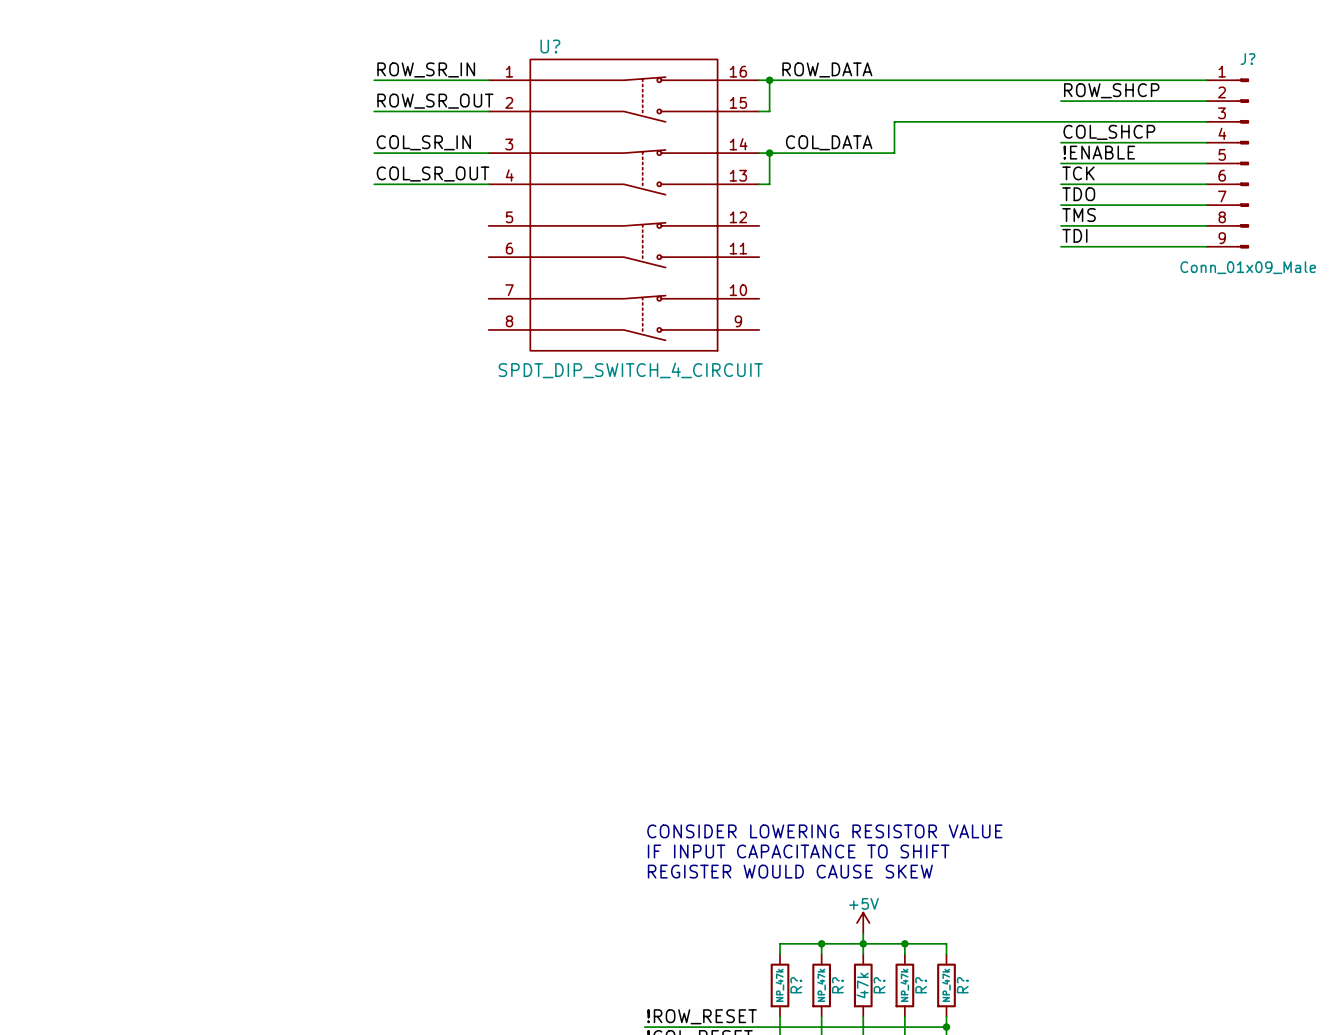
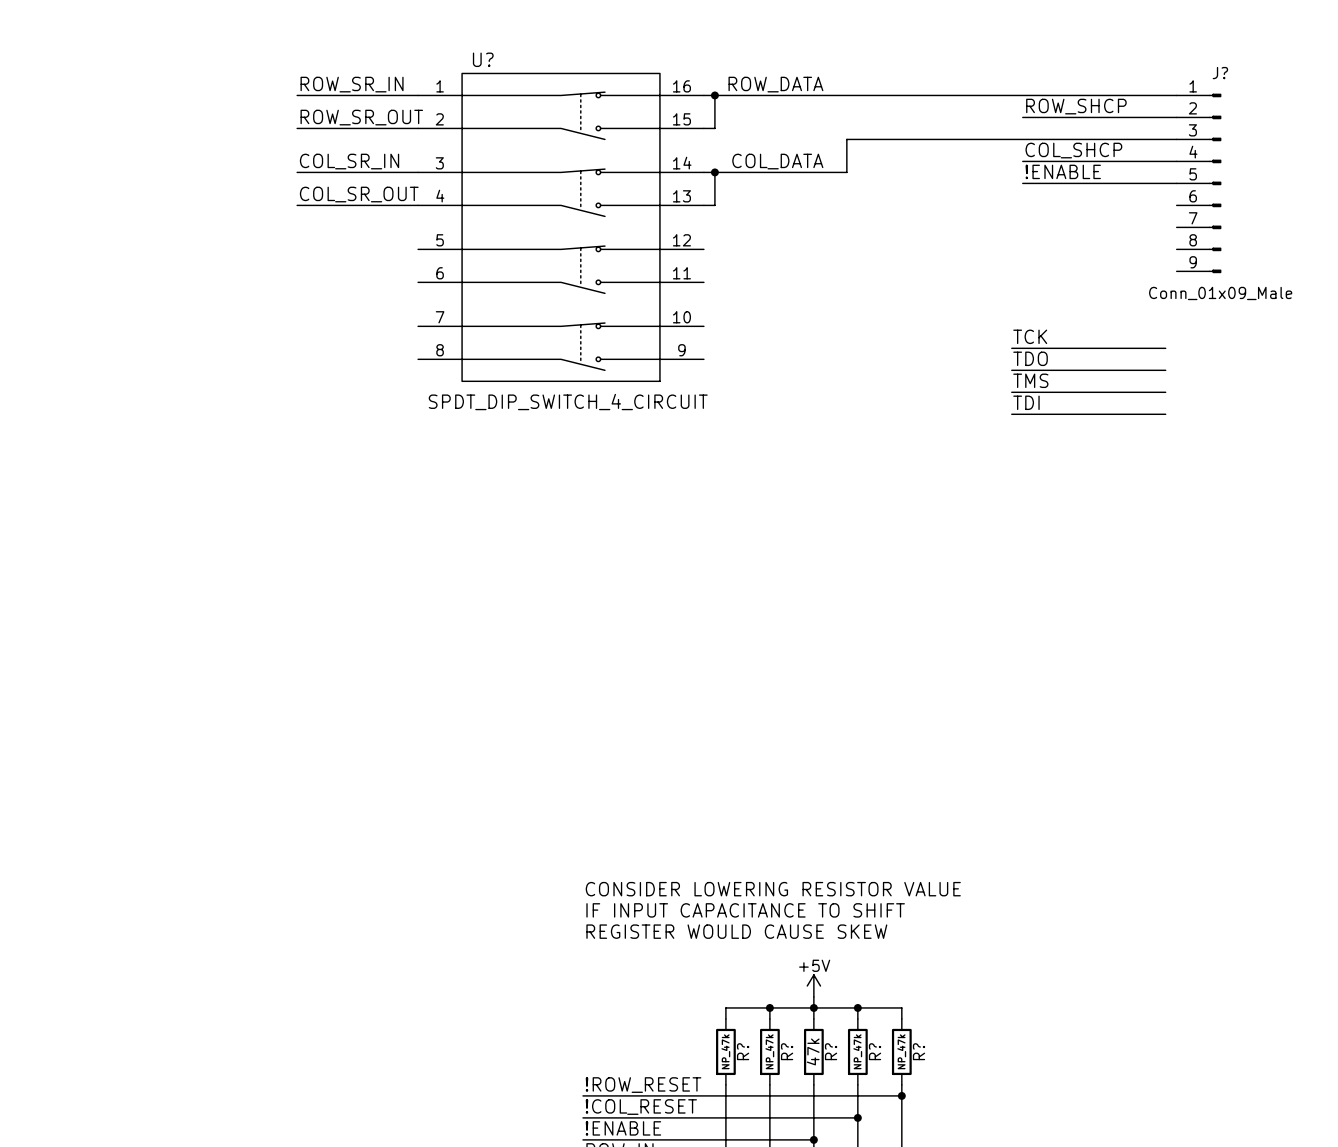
label position: TCK (1078, 173) -> TCK (1030, 336)
wire: (1060, 184) (1206, 184) -> (1011, 414) (1165, 414)
label position: TDO (1078, 194) -> TDO (1030, 358)
wire: (1060, 205) (1206, 205) -> (1011, 392) (1165, 392)
label position: TMS (1079, 215) -> TMS (1030, 380)
wire: (1060, 225) (1206, 225) -> (1011, 370) (1165, 370)
label position: TDI (1074, 235) -> TDI (1026, 402)
wire: (1060, 246) (1206, 246) -> (1011, 348) (1165, 348)

